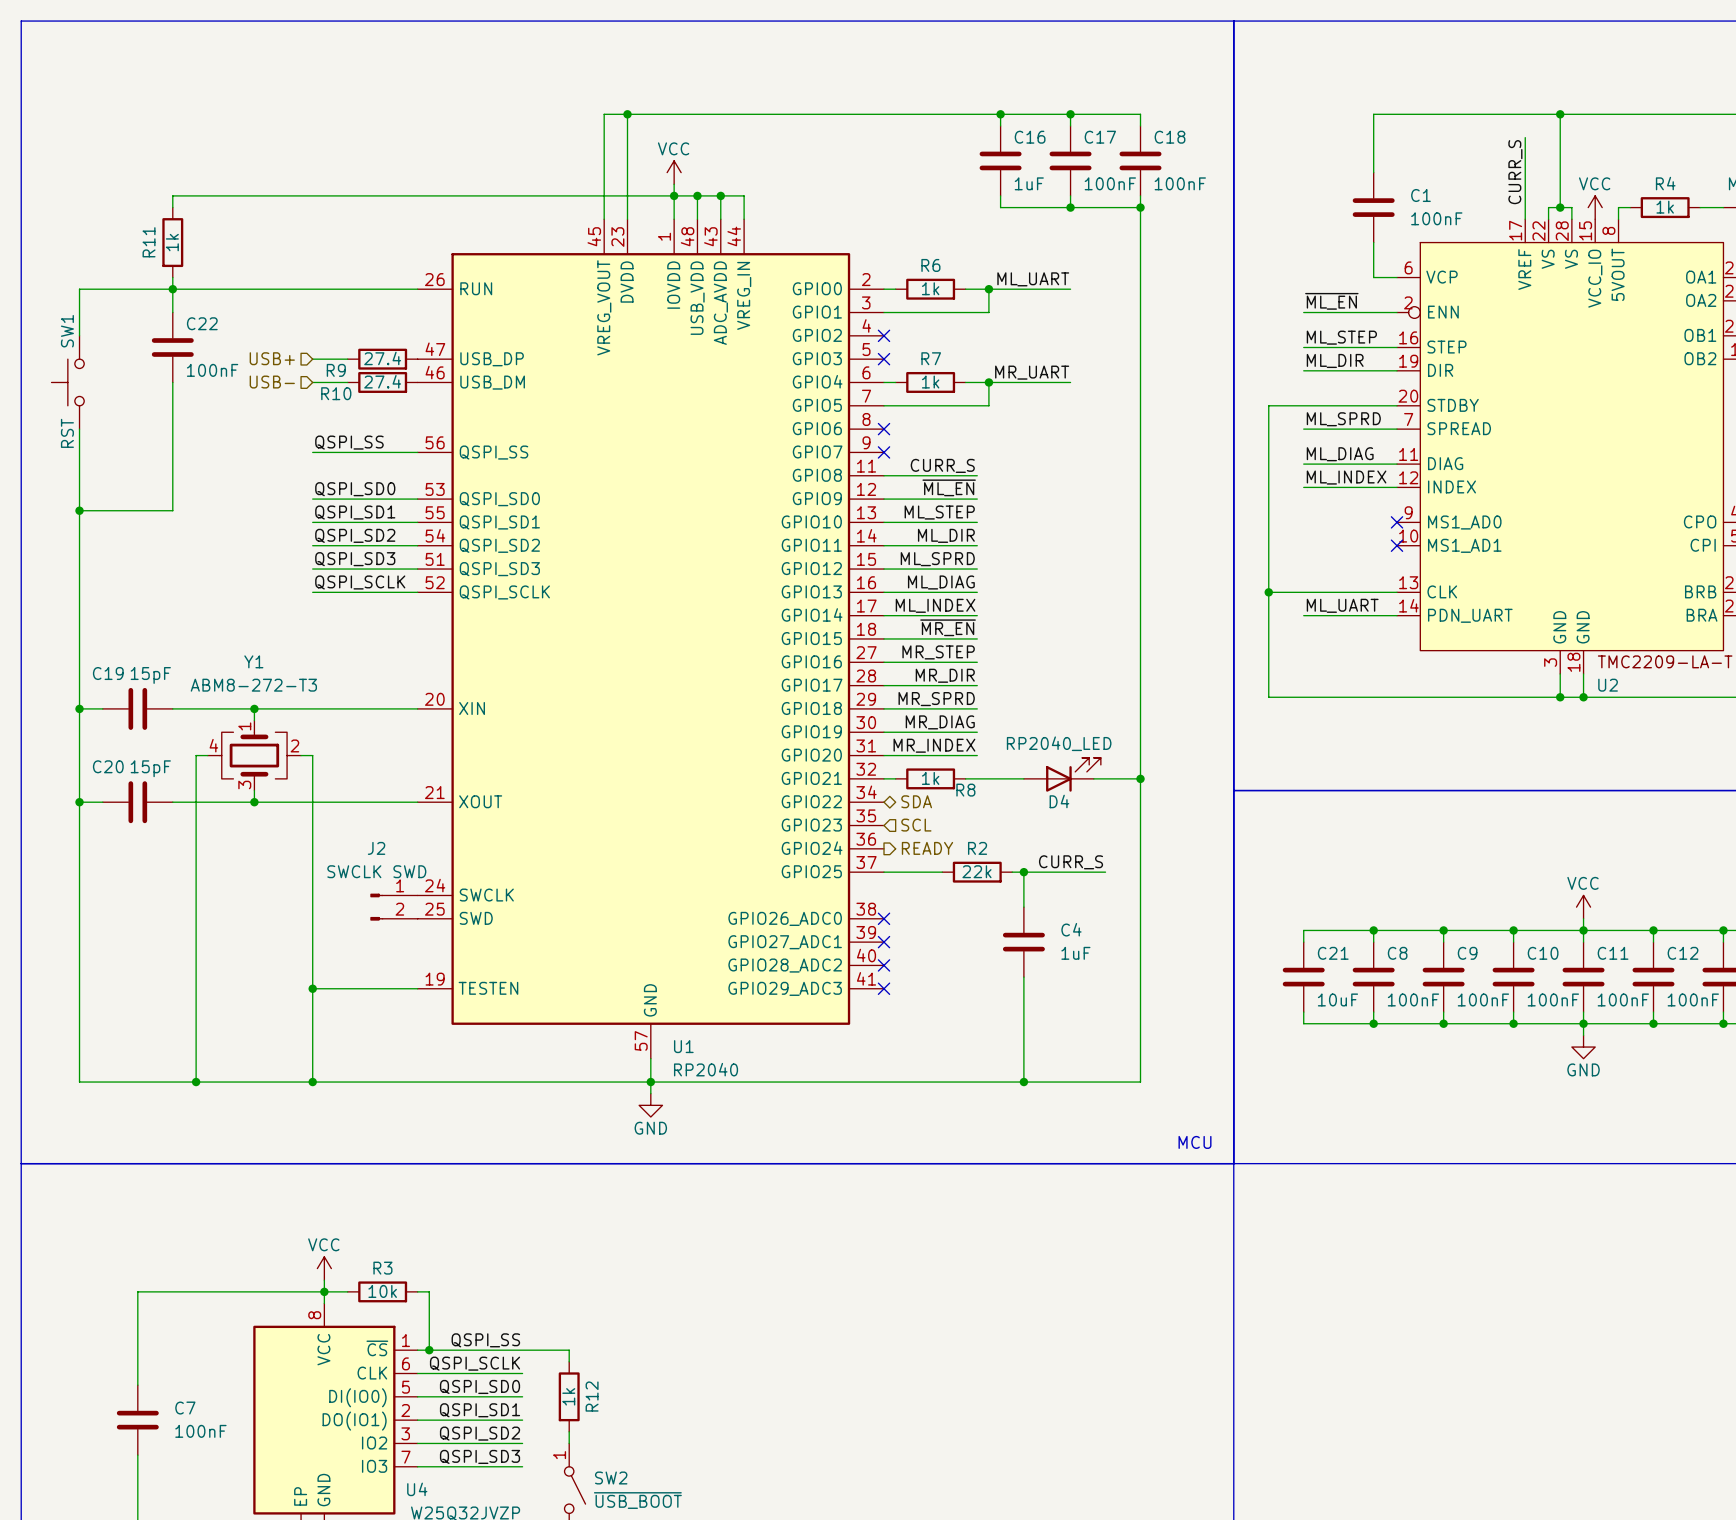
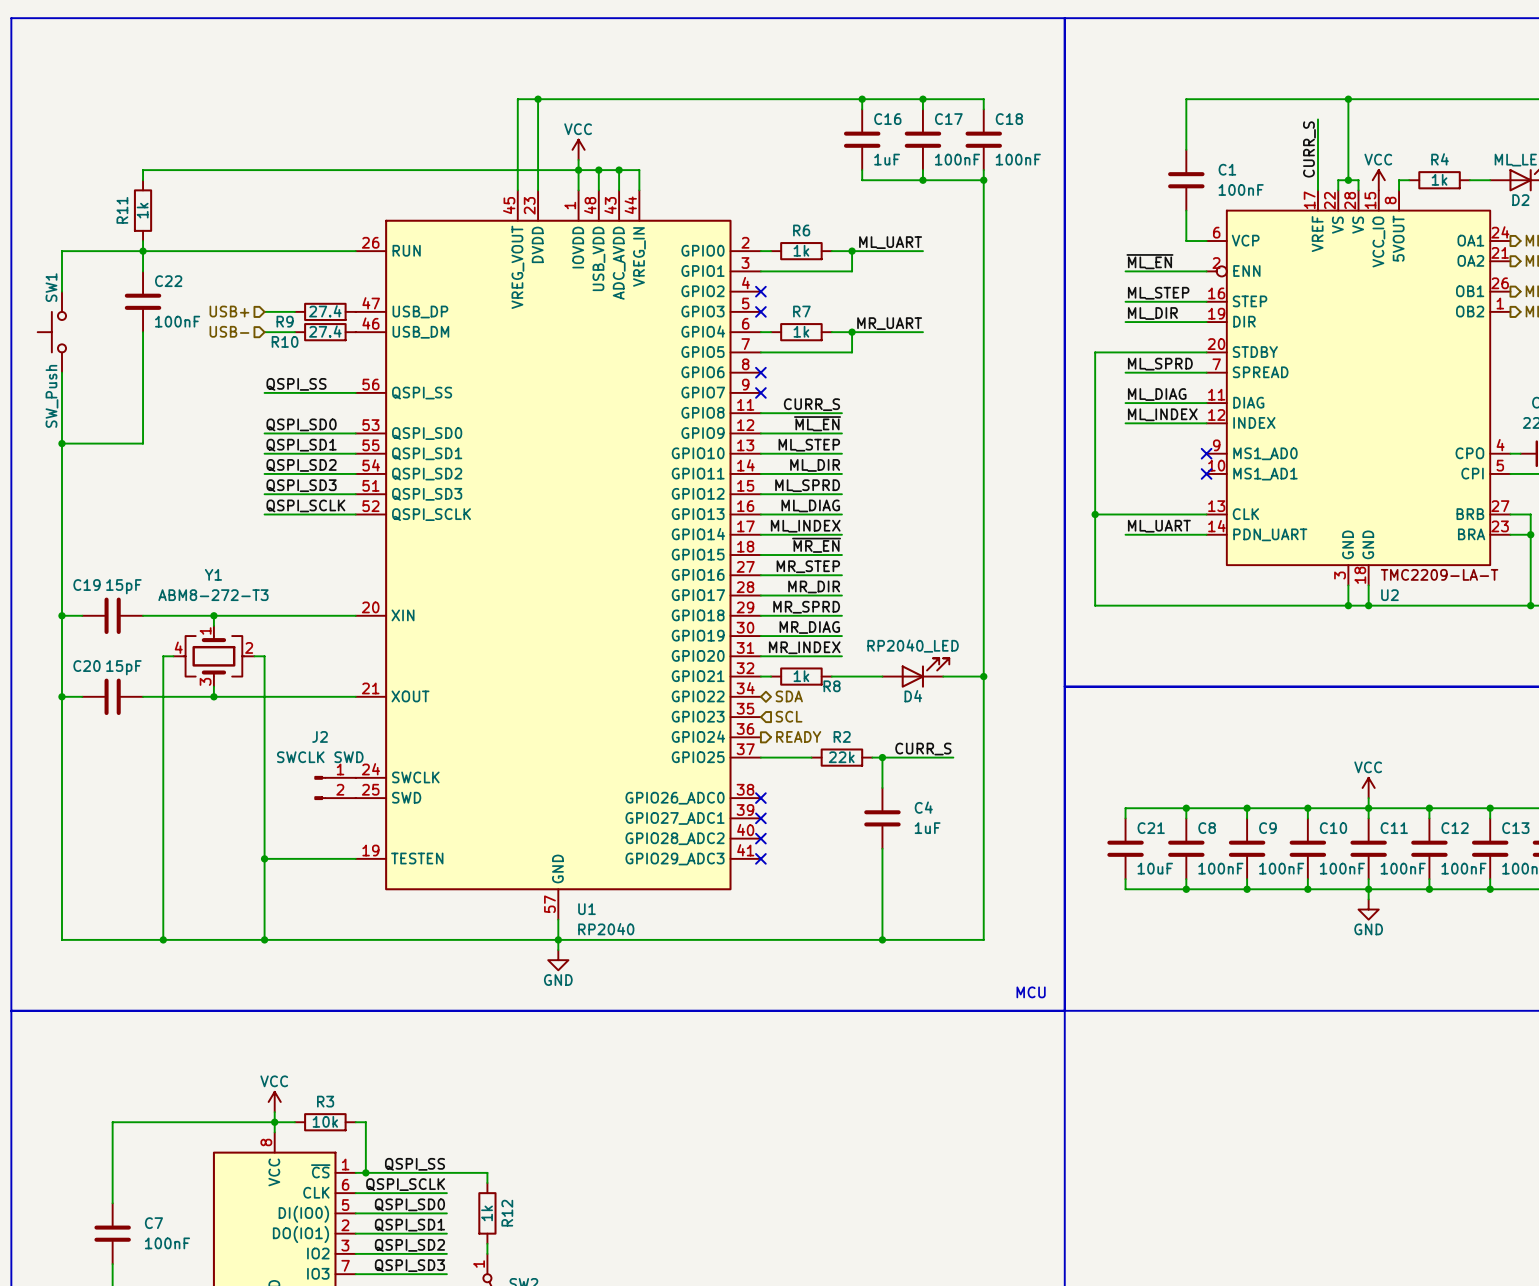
SW1 value: RST (67, 433) -> SW_Push (51, 396)

